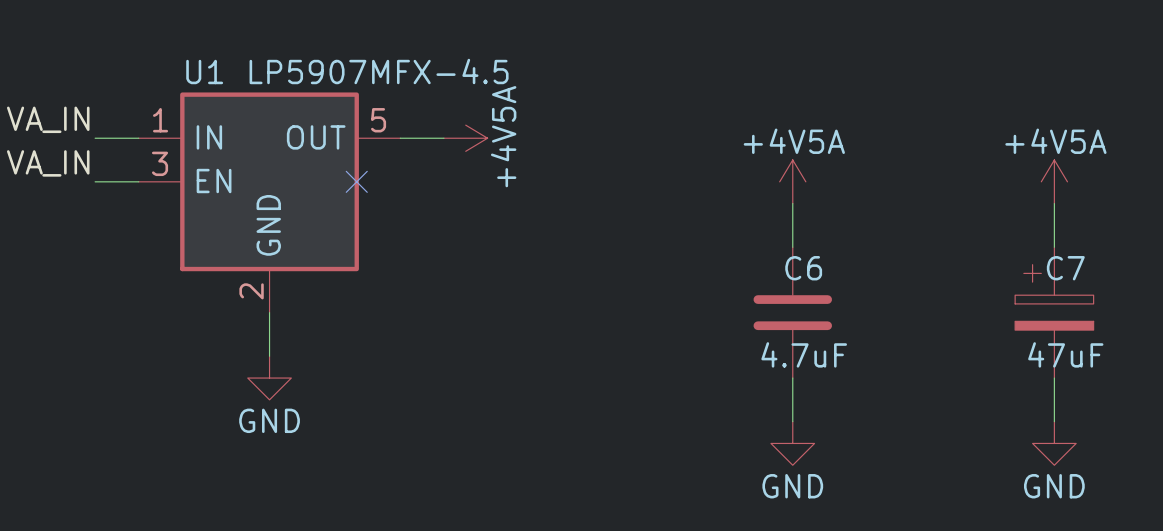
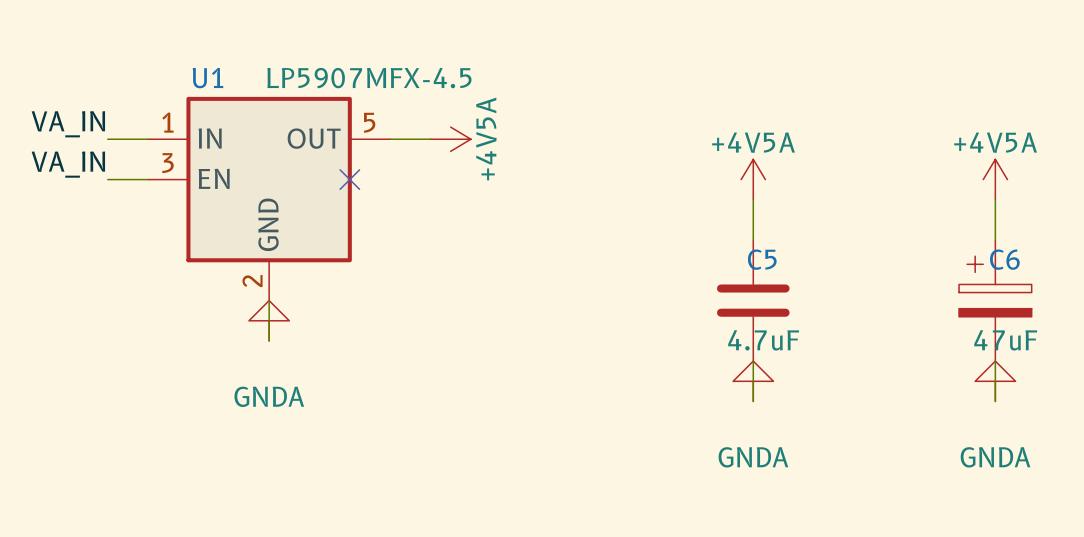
C6 name: C6 (803, 268) -> C5 (762, 259)
C7 name: C7 (1065, 268) -> C6 (1004, 259)
power symbol: none -> GNDA (269, 320)
power symbol: GND (269, 378) -> none
power symbol: none -> GNDA (753, 381)
power symbol: none -> GNDA (995, 381)
power symbol: GND (792, 443) -> none
power symbol: GND (1054, 443) -> none

